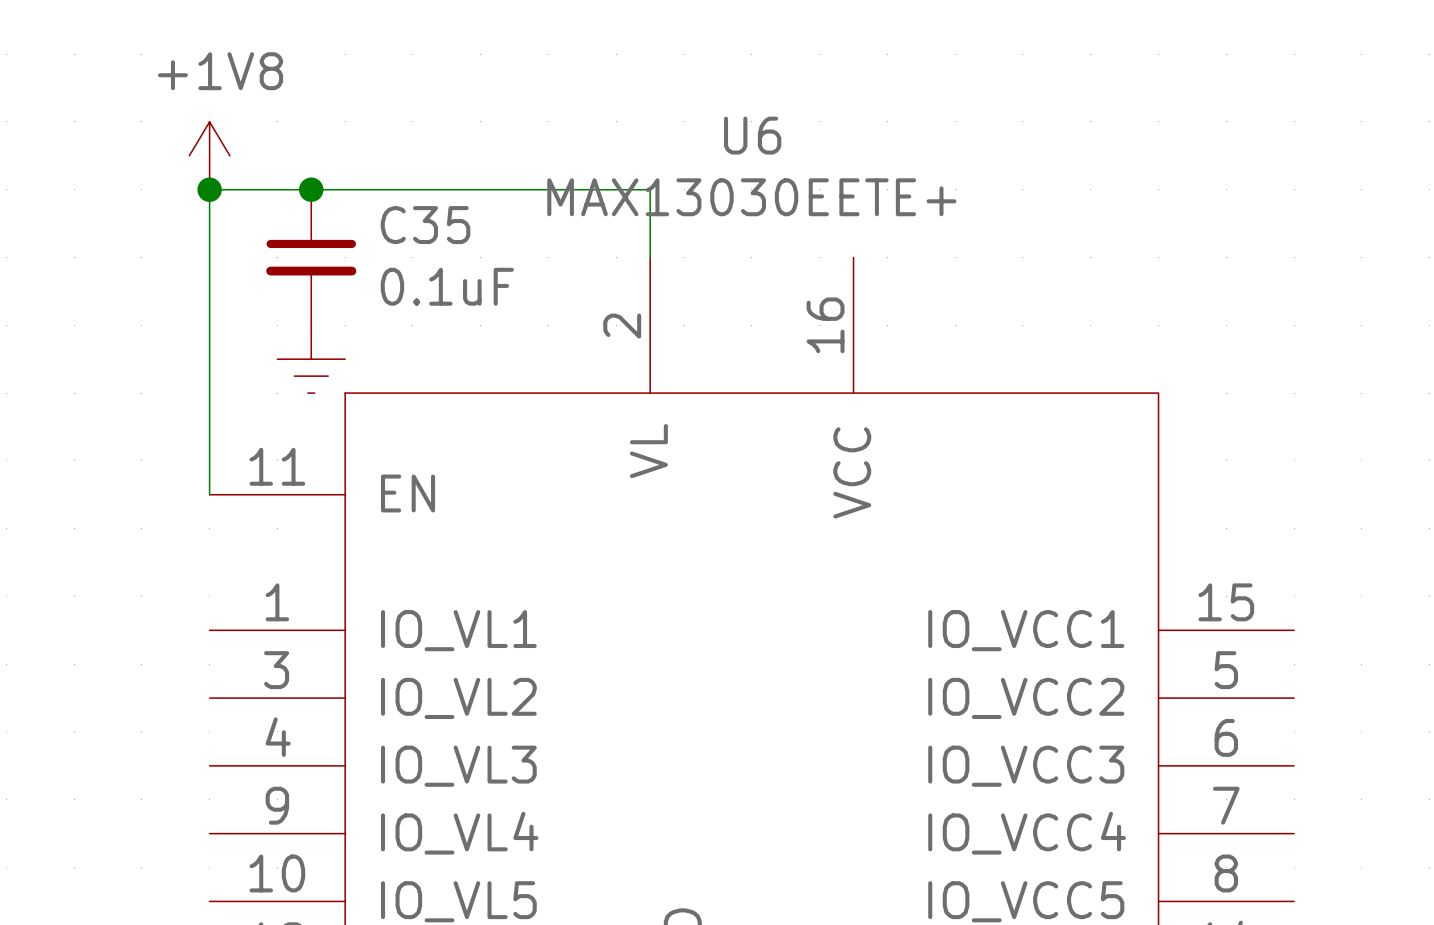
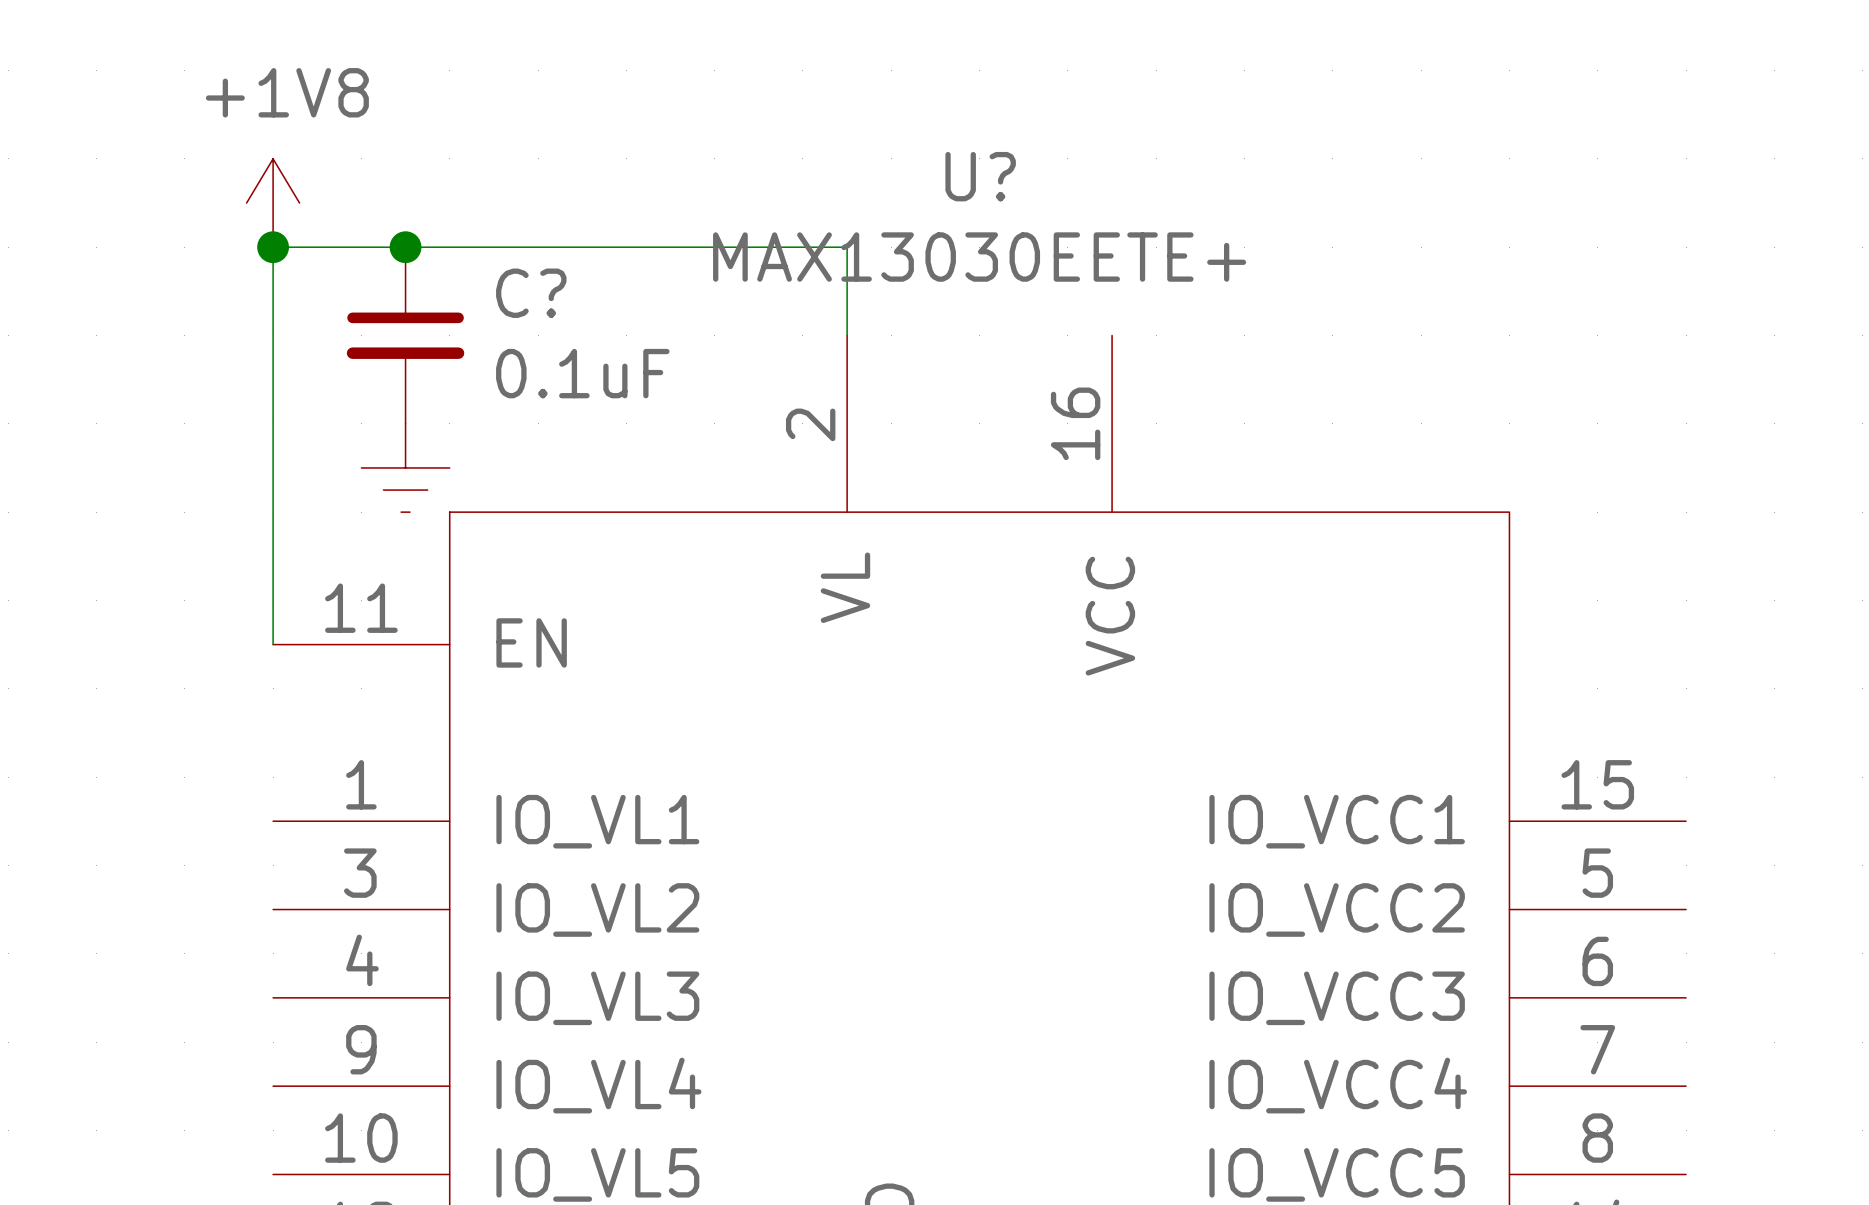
U6 name: U6 (752, 135) -> U? (980, 176)
C35 name: C35 (425, 225) -> C? (531, 293)

